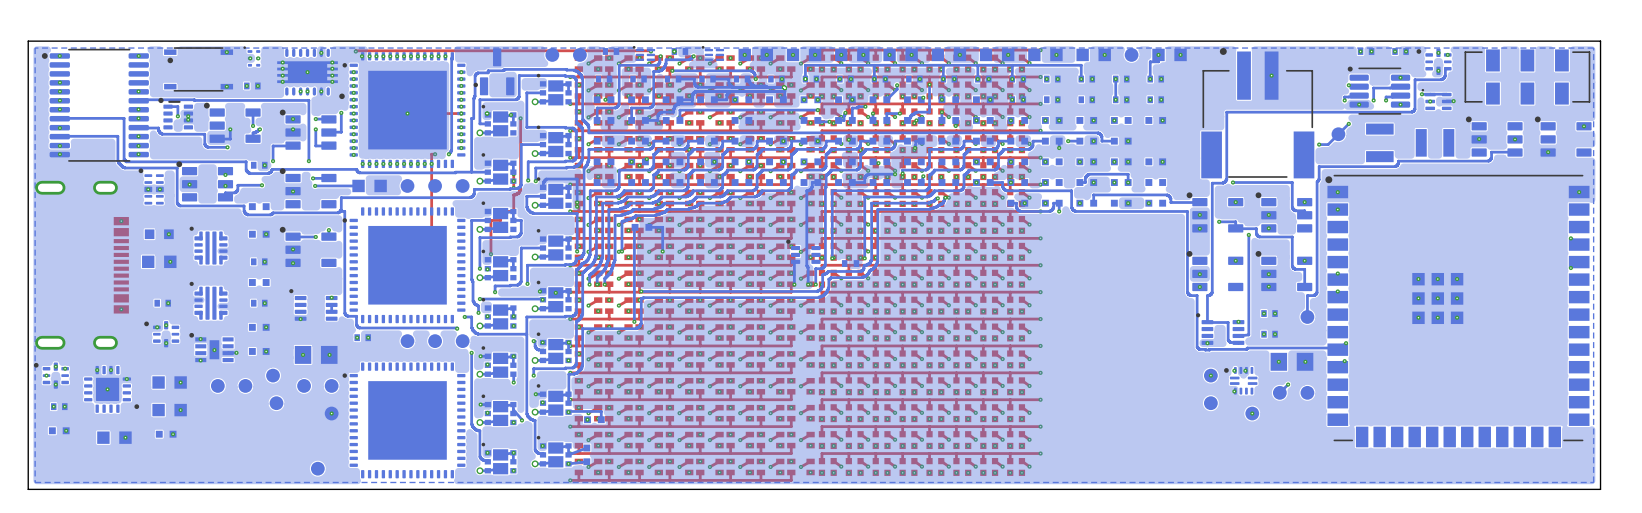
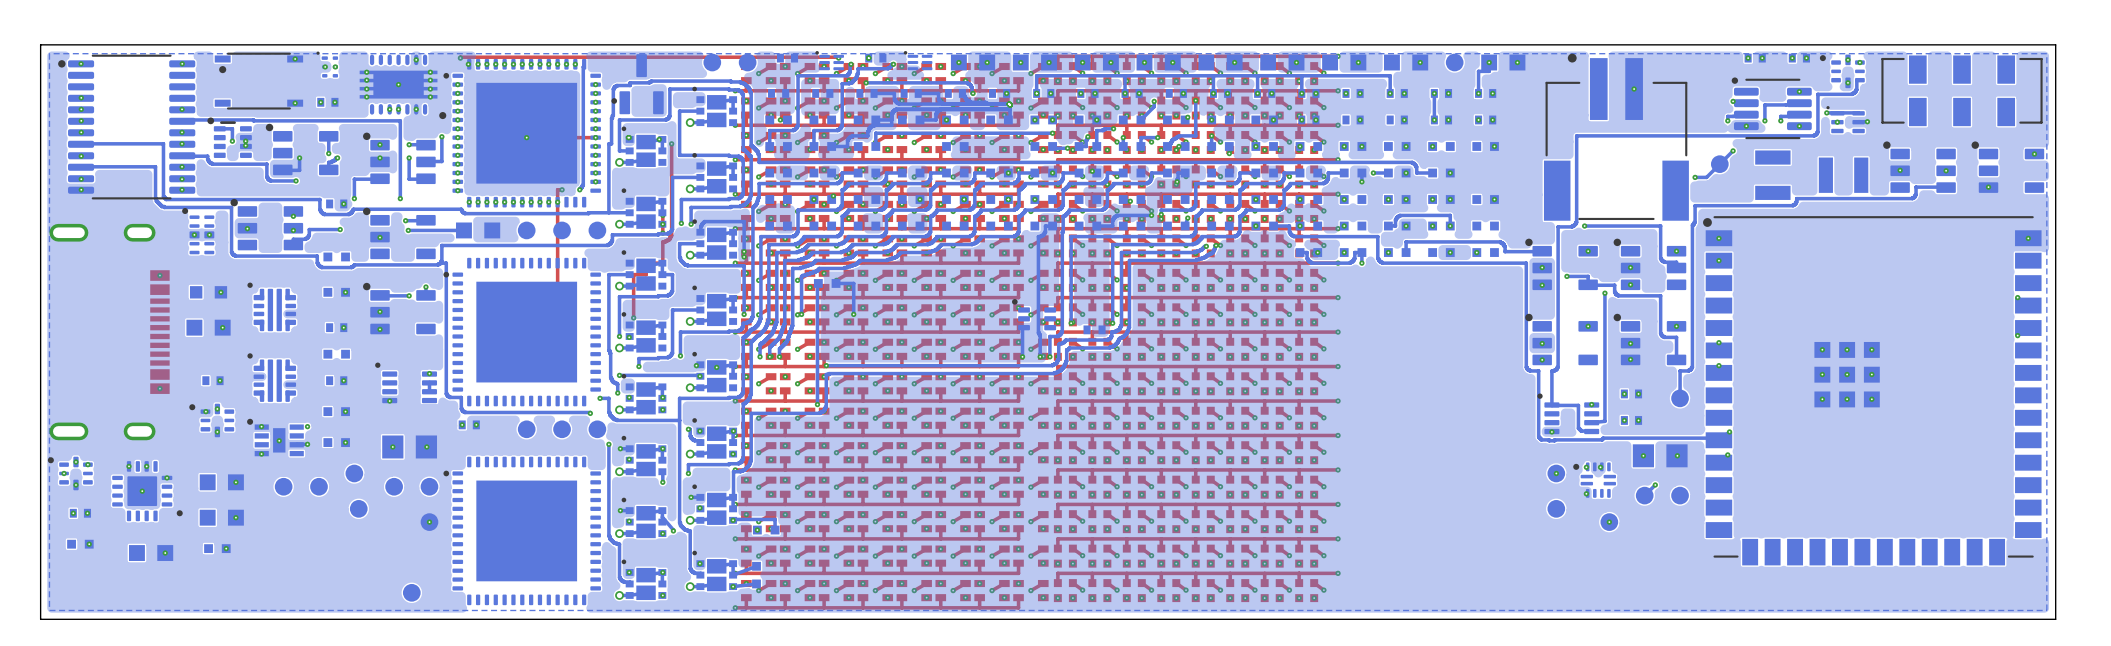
via: none -> (307, 426)

